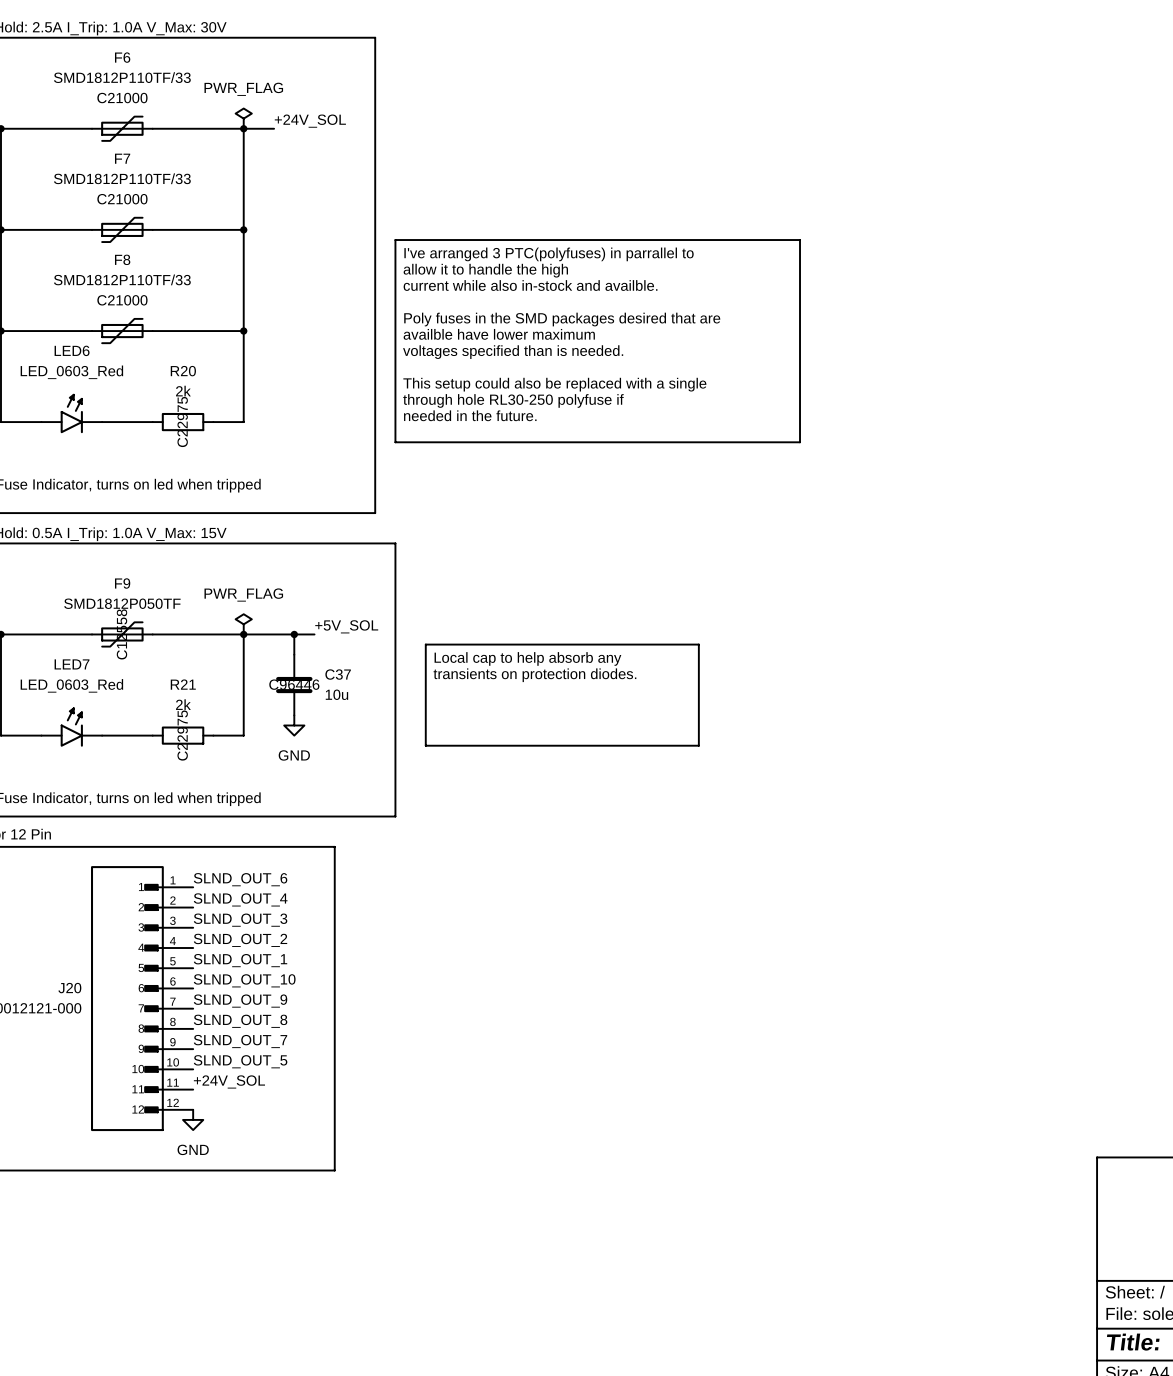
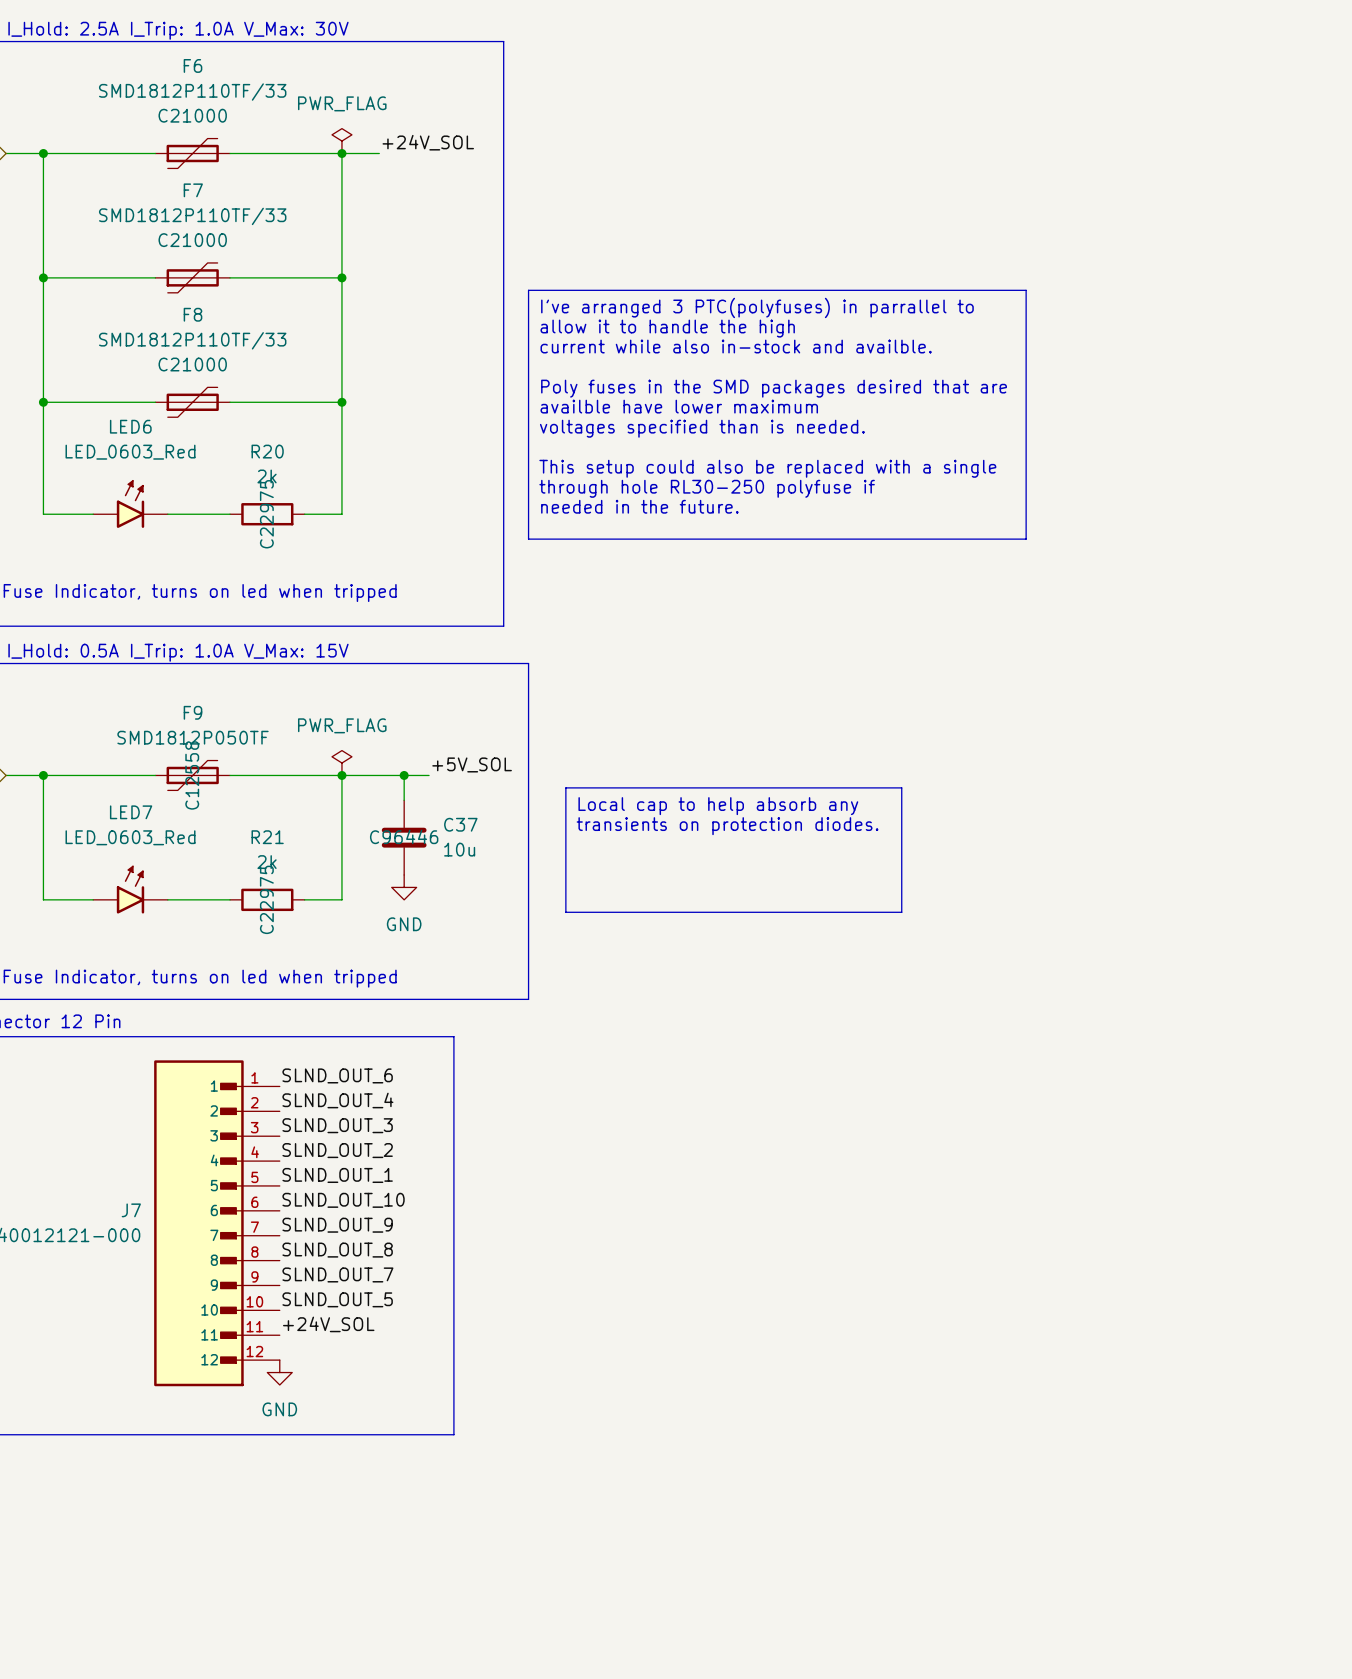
J20 name: J20 (69, 988) -> J7 (131, 1210)

